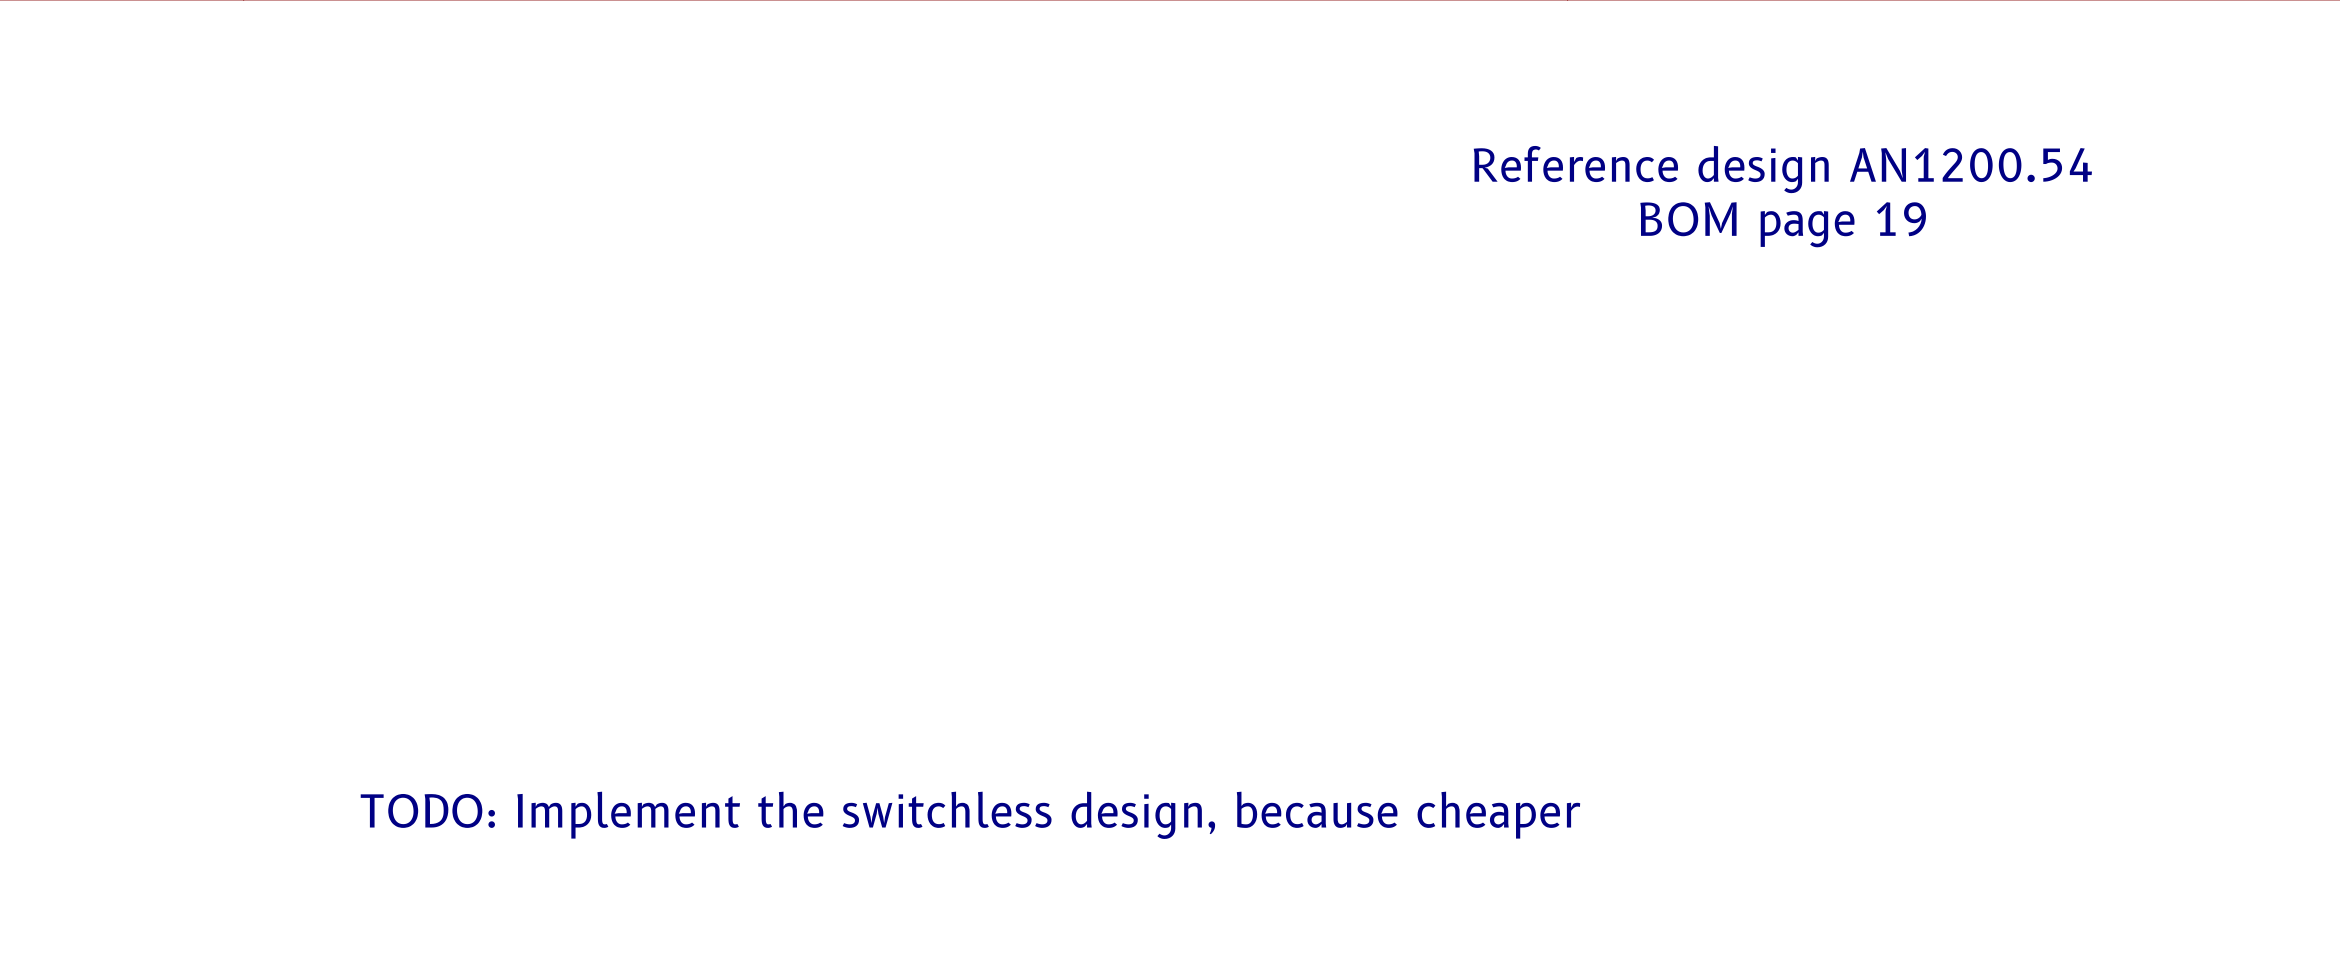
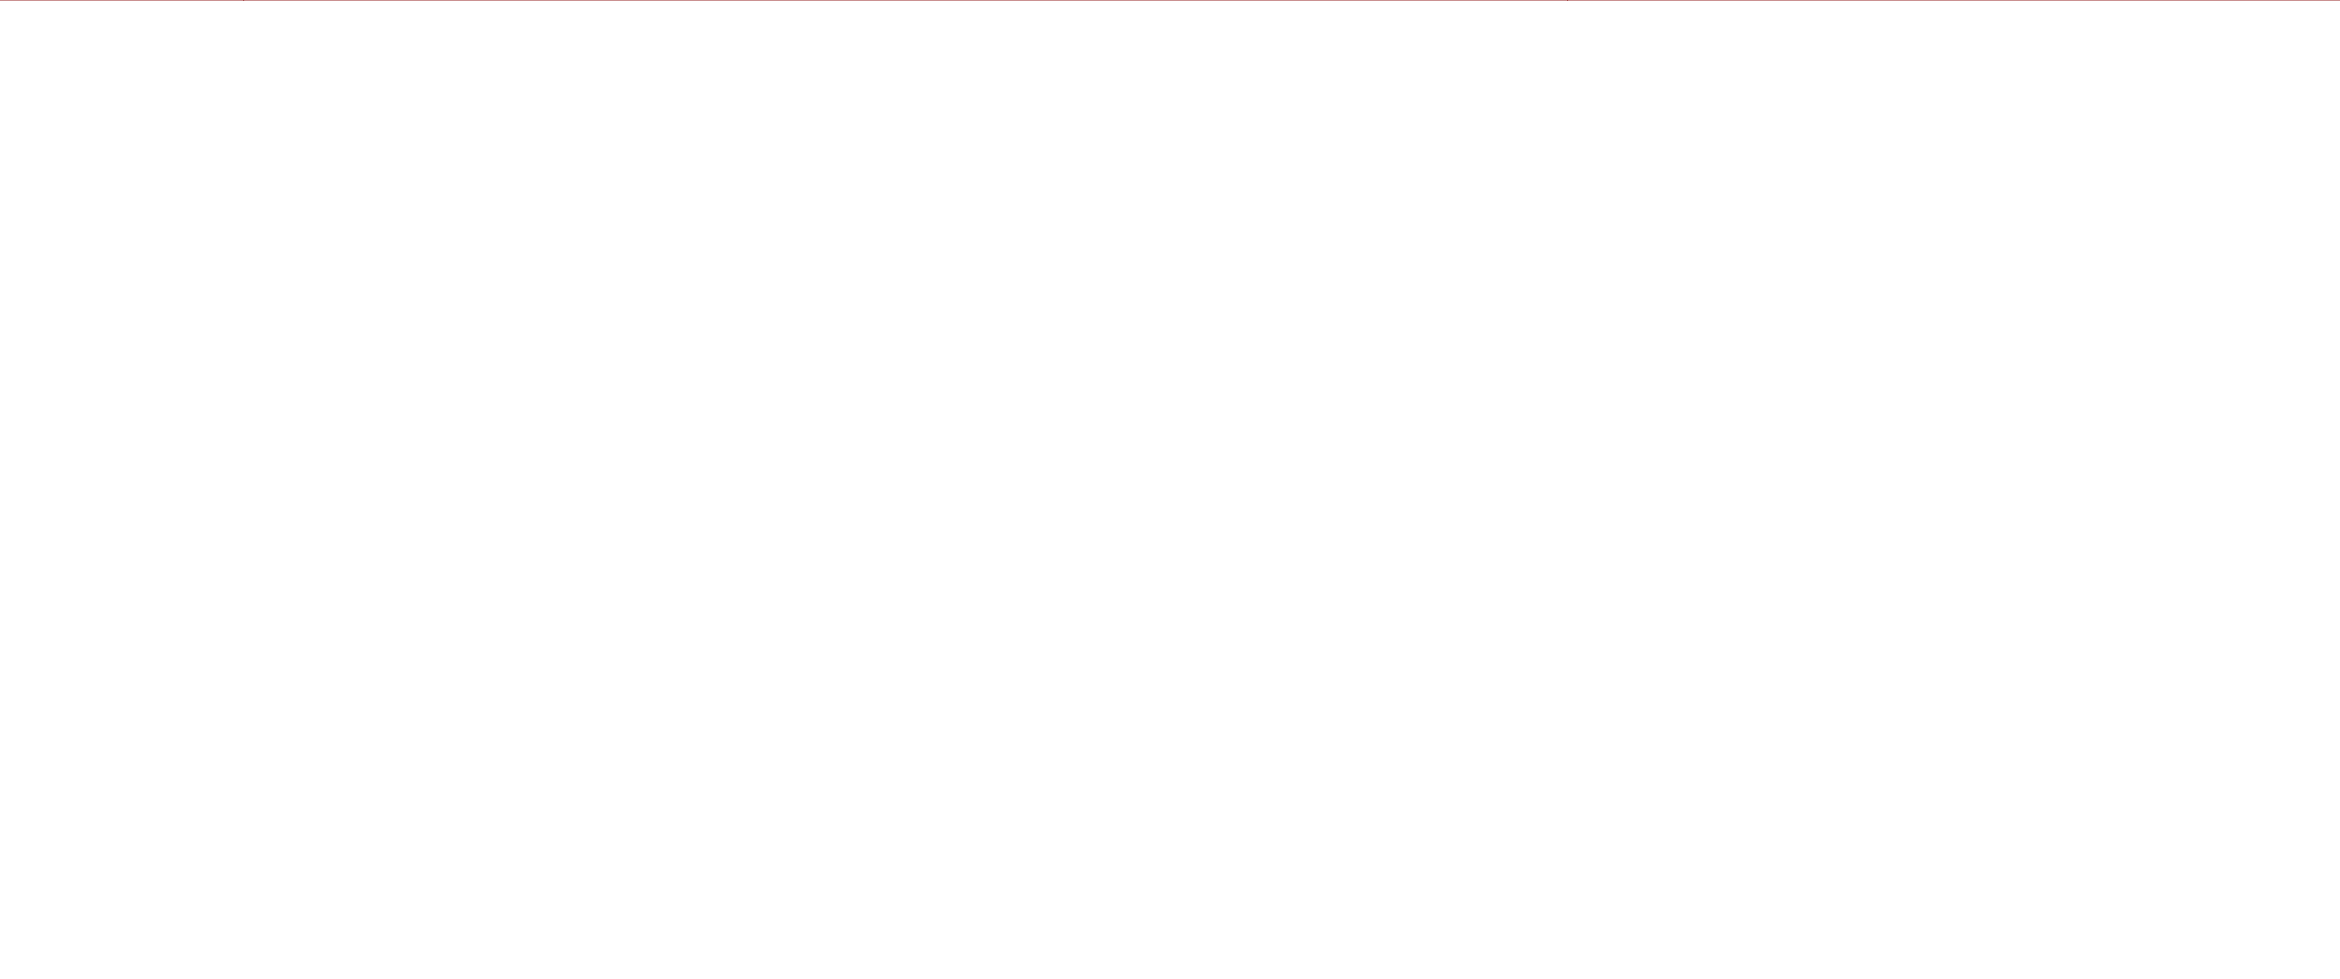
text: Reference design AN1200.54 (1782, 169) -> none
text: BOM page 19 (1783, 224) -> none
text: TODO: Implement the switchless design, because cheaper (970, 815) -> none

